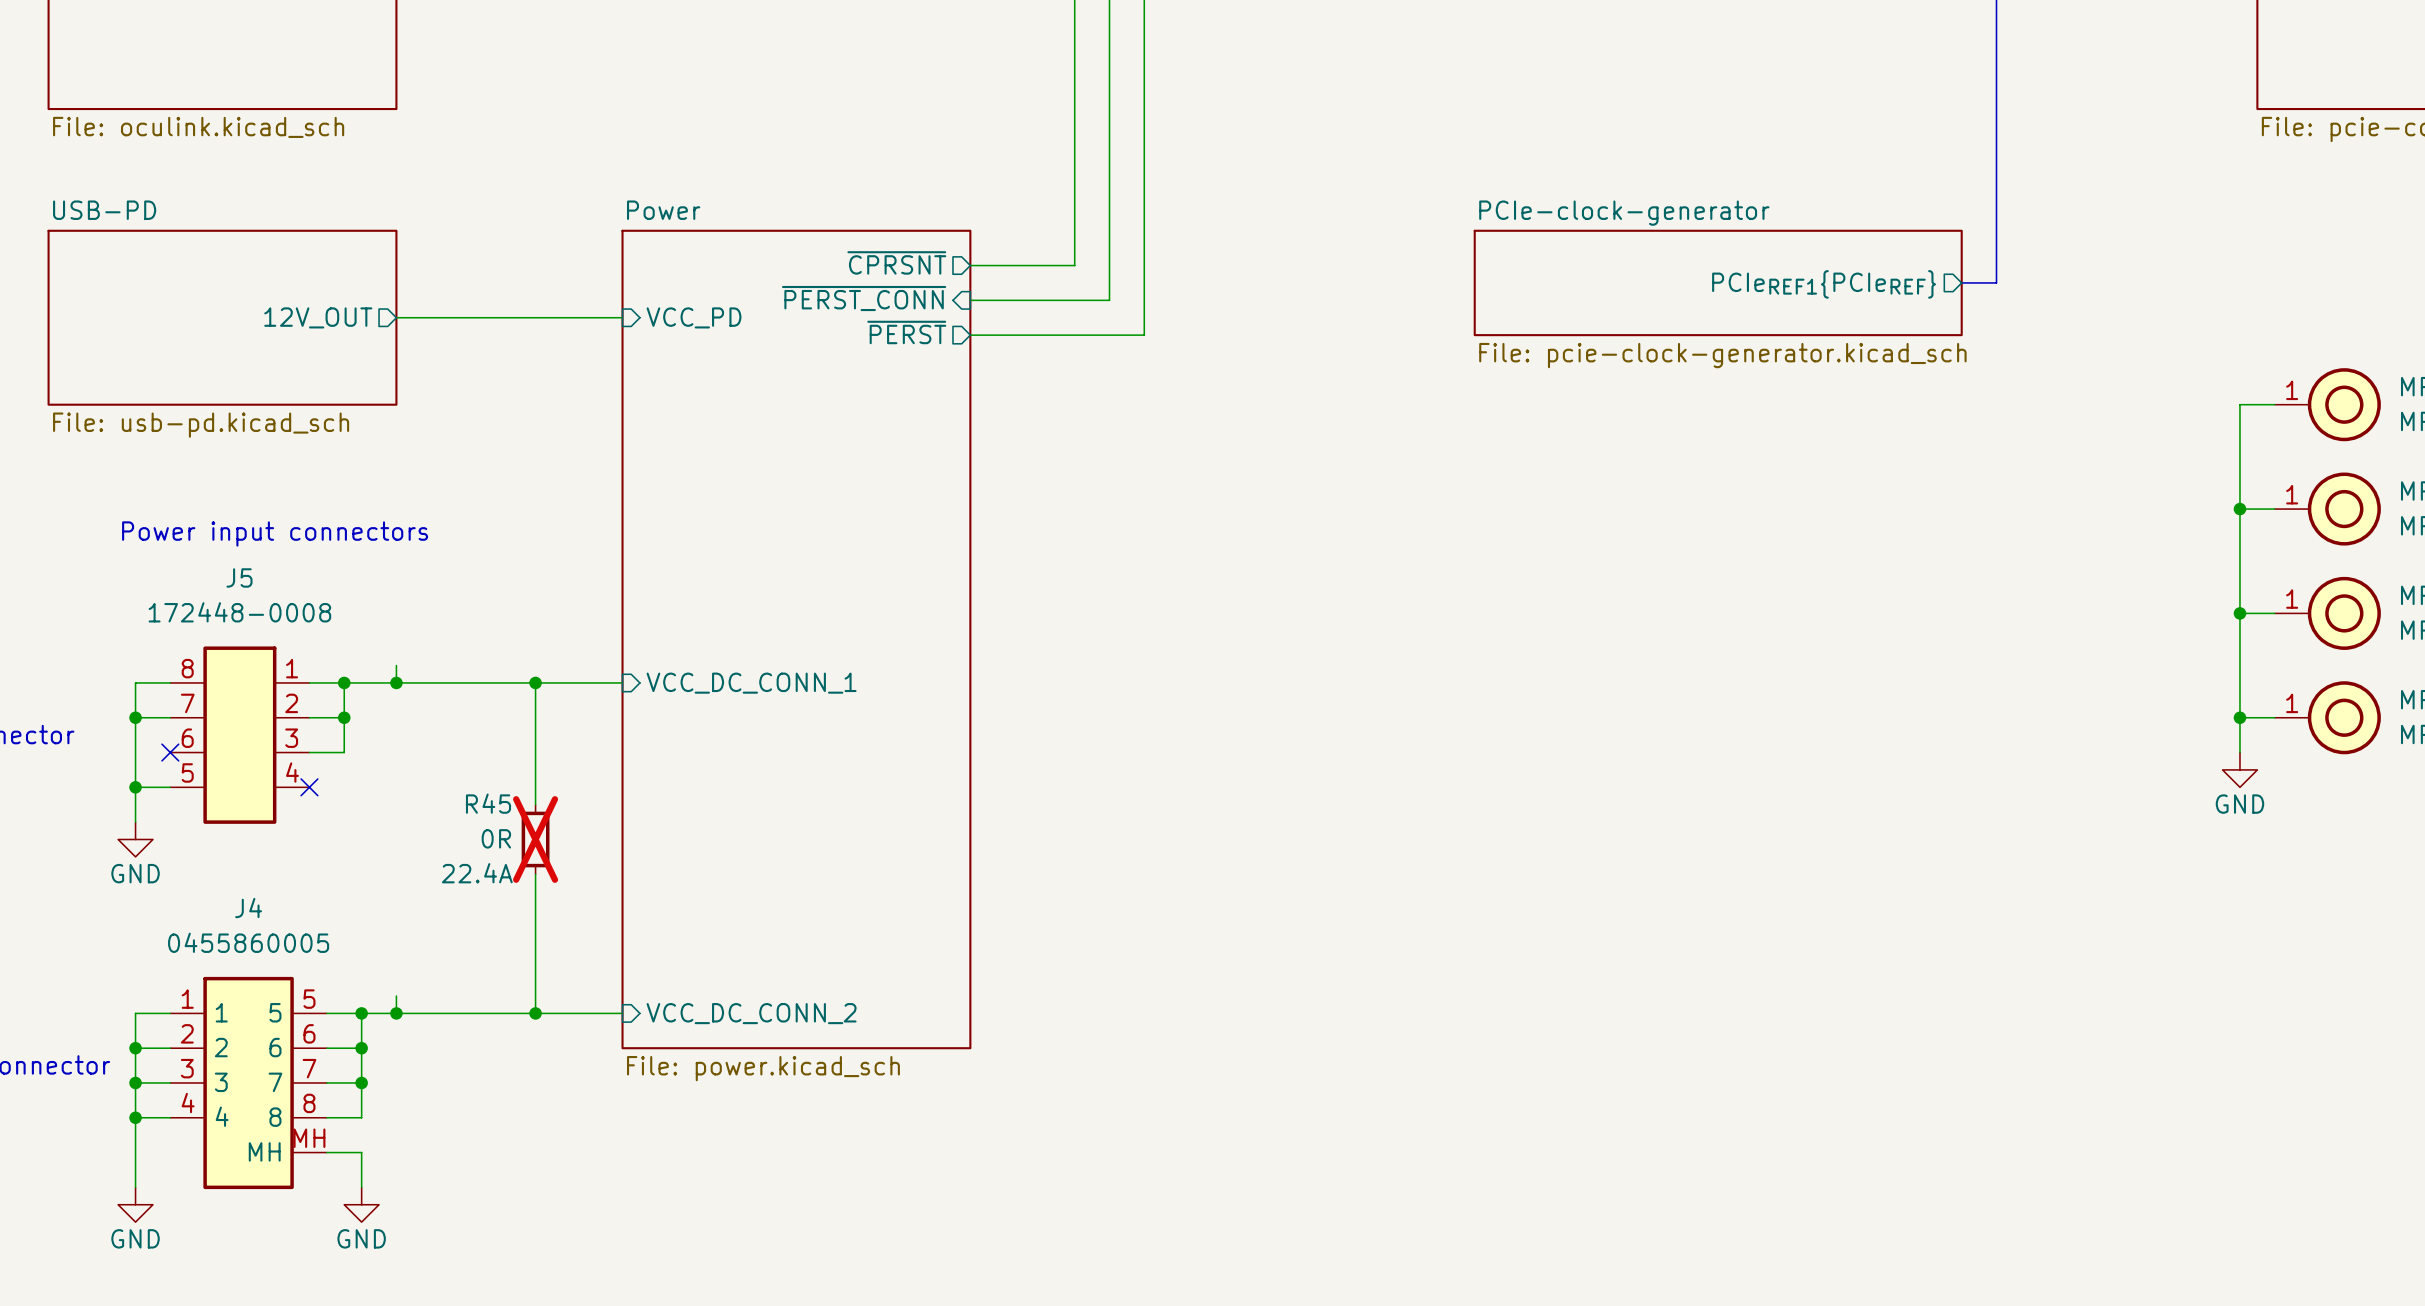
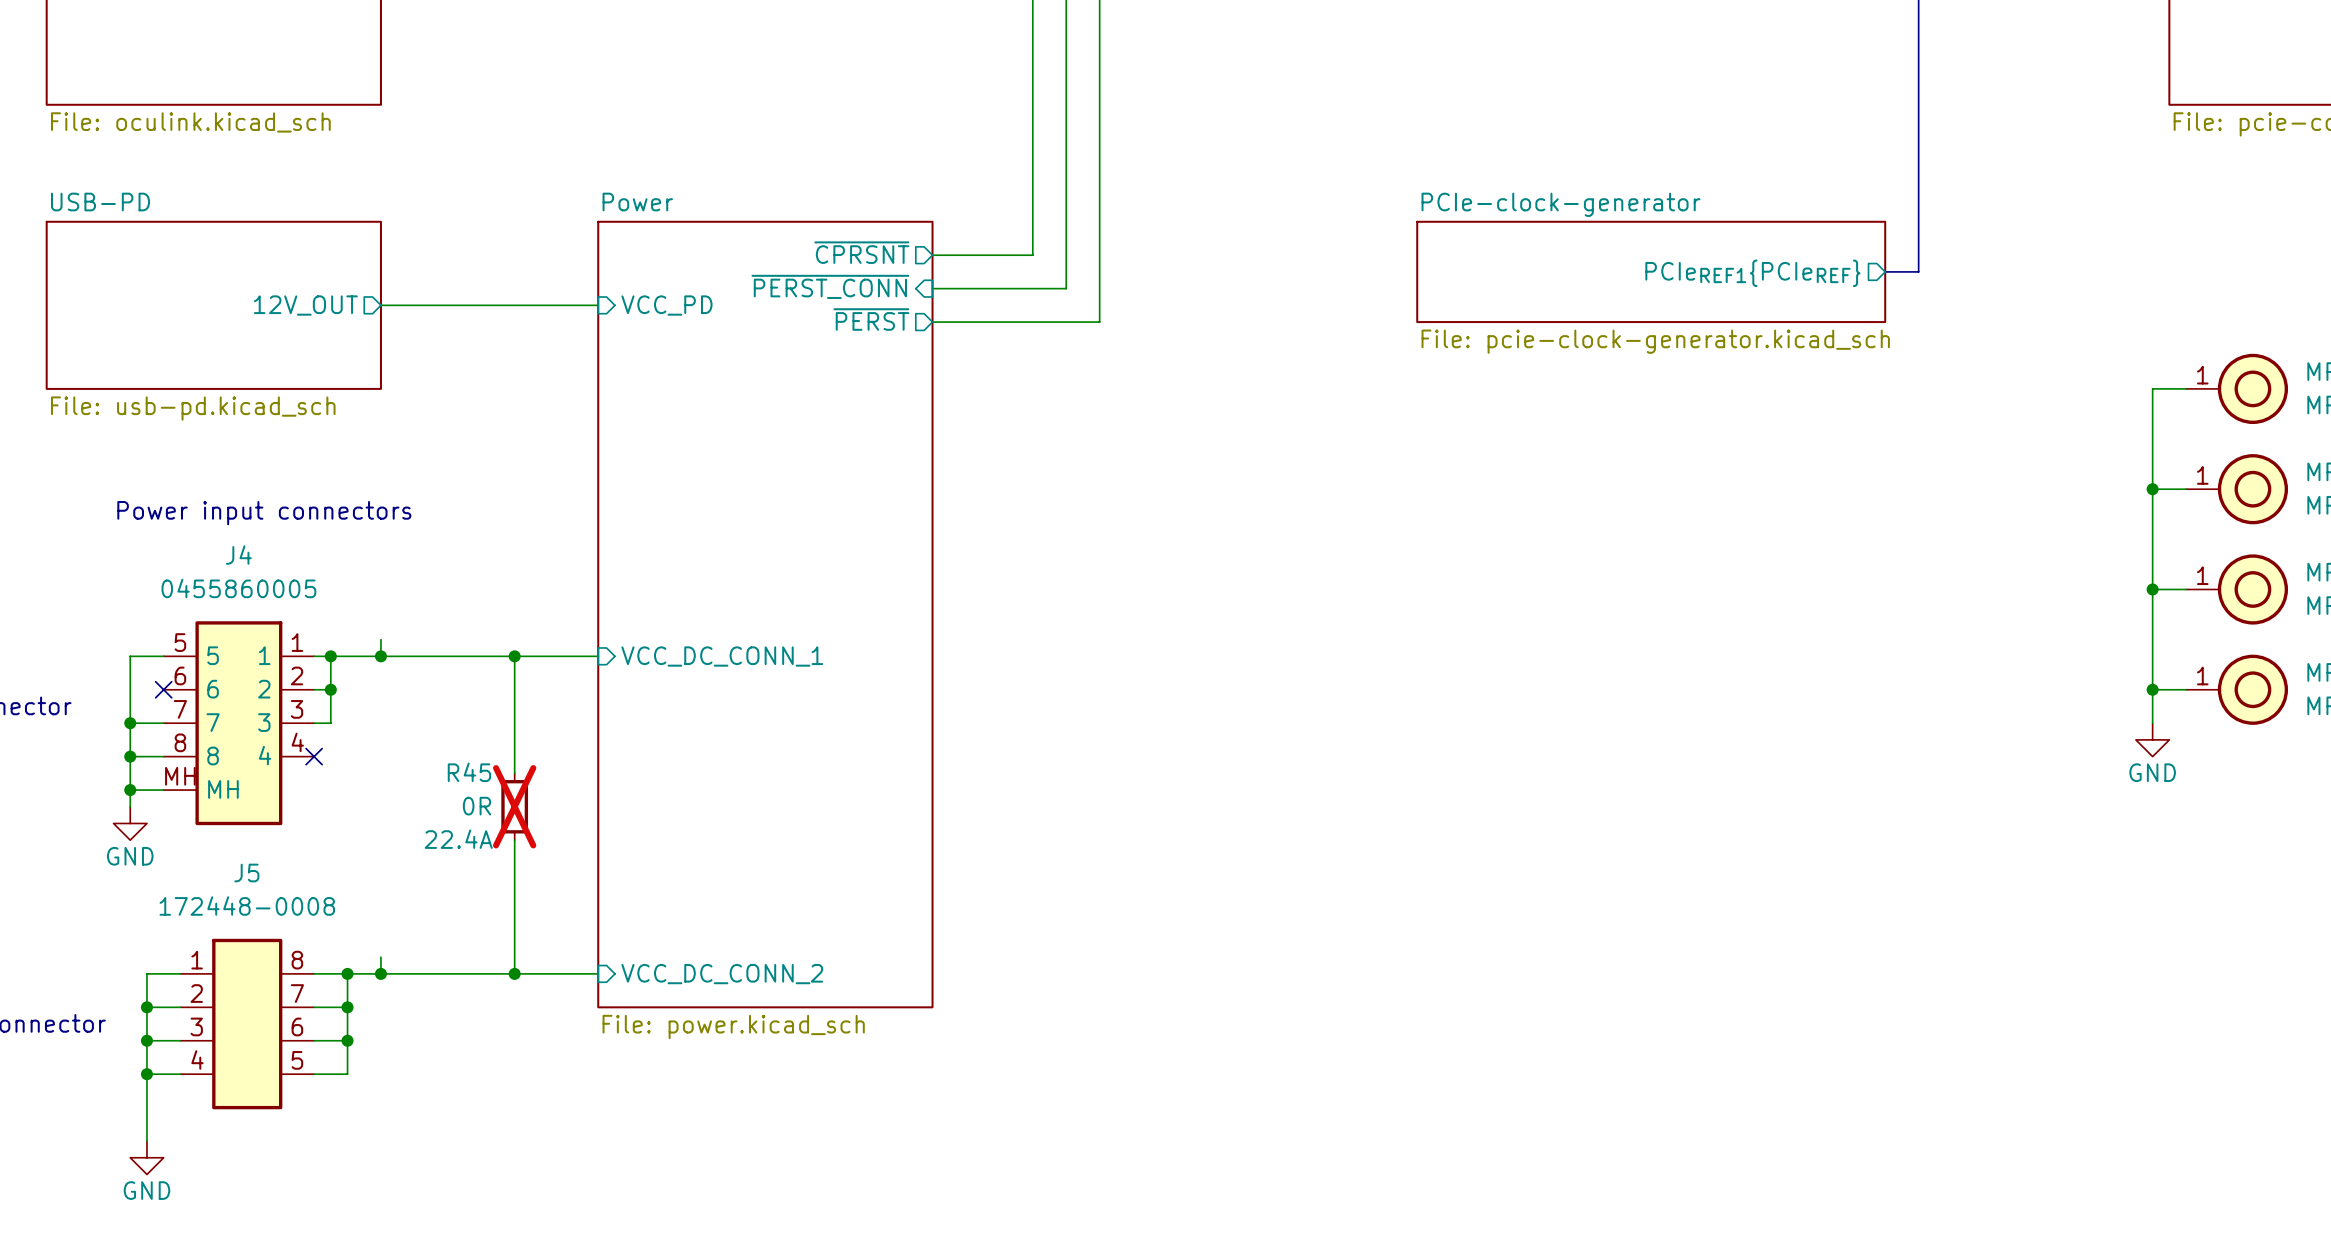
wire: (135, 717) (170, 717) -> (130, 723) (163, 723)
junction position: (135, 717) -> (130, 723)
J5 flip: as is (239, 735) -> left-right (247, 1024)
J5 position: (239, 735) -> (247, 1024)
no-connect mark position: (170, 752) -> (163, 689)
no-connect mark position: (309, 787) -> (314, 756)
junction: none -> (130, 790)
wire: none -> (163, 790) (130, 790) (130, 806)
power symbol position: GND (135, 839) -> GND (130, 823)
wire: (152, 1013) (135, 1013) (135, 1187) -> (146, 973) (146, 1141)
junction position: (135, 1048) -> (146, 1007)
junction position: (135, 1082) -> (146, 1040)
J4 flip: as is (248, 1082) -> left-right (238, 723)
J4 position: (248, 1082) -> (238, 723)
junction position: (135, 1117) -> (146, 1074)
wire: (326, 1152) (361, 1152) (361, 1187) -> none
power symbol position: GND (135, 1204) -> GND (146, 1157)
power symbol: GND (361, 1204) -> none

